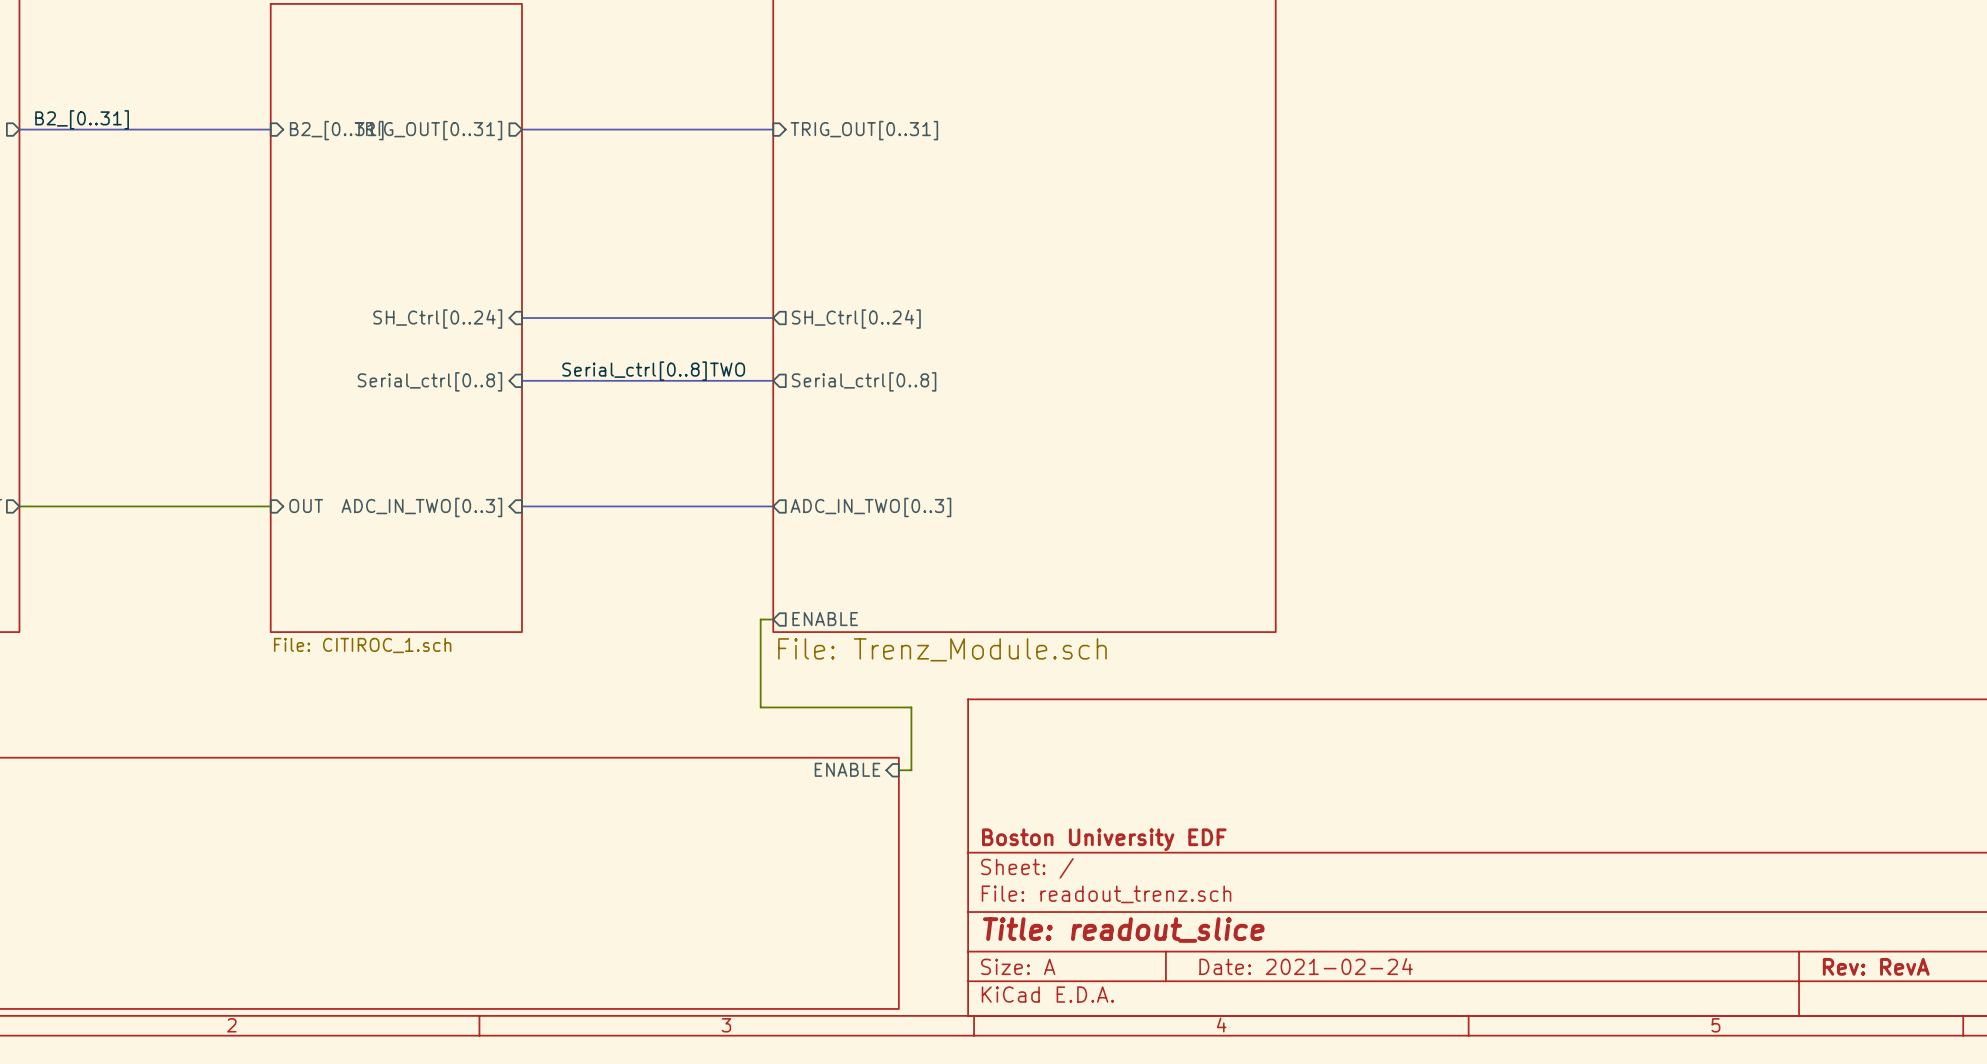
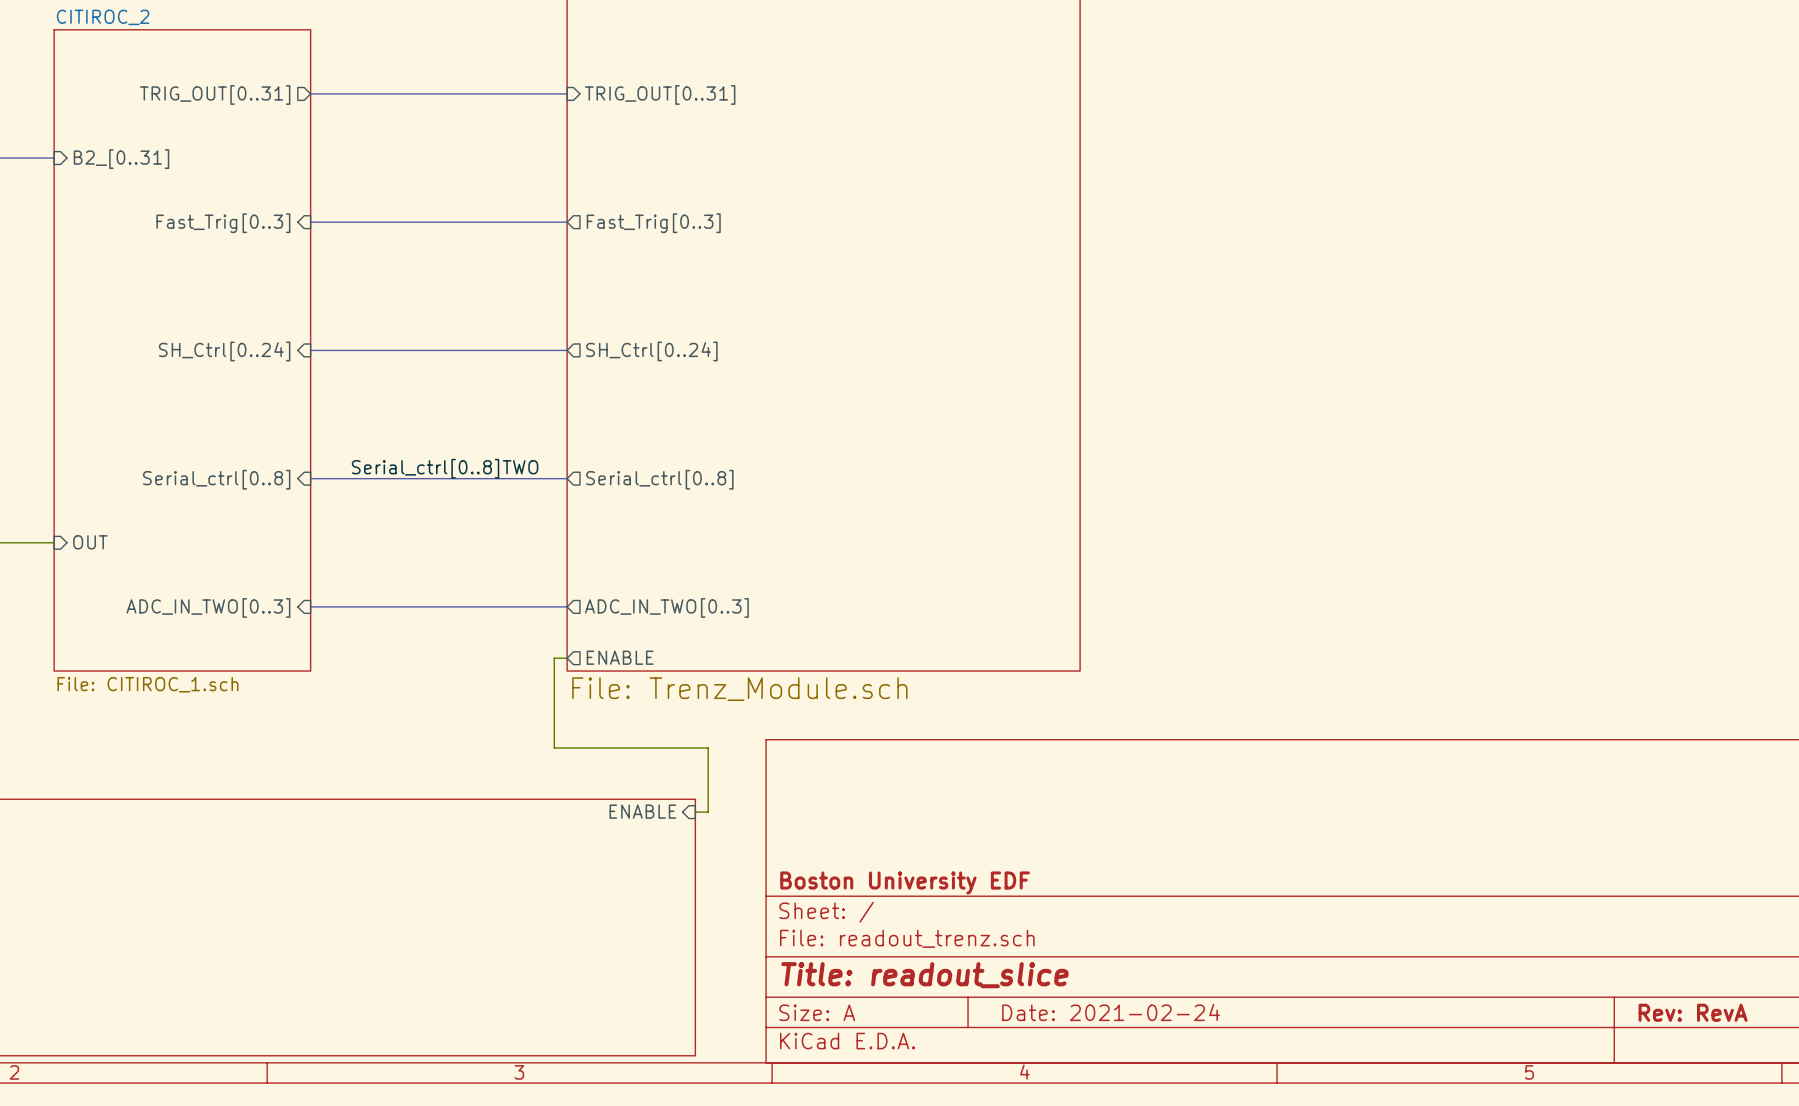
bus: none -> (310, 93) (567, 93)
bus: (521, 129) (773, 129) -> (310, 222) (567, 222)
sheet pin position: TRIG_OUT[0..31] (428, 130) -> TRIG_OUT[0..31] (215, 94)
sheet pin position: TRIG_OUT[0..31] (864, 130) -> TRIG_OUT[0..31] (660, 94)
sheet pin: none -> Fast_Trig[0..3] (223, 223)
sheet pin: none -> Fast_Trig[0..3] (653, 223)
label position: Serial_ctrl[0..8]TWO (653, 371) -> Serial_ctrl[0..8]TWO (445, 468)
bus: (521, 380) (773, 380) -> (310, 478) (567, 478)
sheet pin position: Serial_ctrl[0..8] (429, 381) -> Serial_ctrl[0..8] (216, 479)
sheet pin position: Serial_ctrl[0..8] (864, 381) -> Serial_ctrl[0..8] (659, 479)
bus: (521, 506) (773, 506) -> (310, 606) (567, 606)
sheet pin position: ADC_IN_TWO[0..3] (421, 507) -> ADC_IN_TWO[0..3] (208, 607)
sheet pin position: ADC_IN_TWO[0..3] (870, 507) -> ADC_IN_TWO[0..3] (666, 607)

